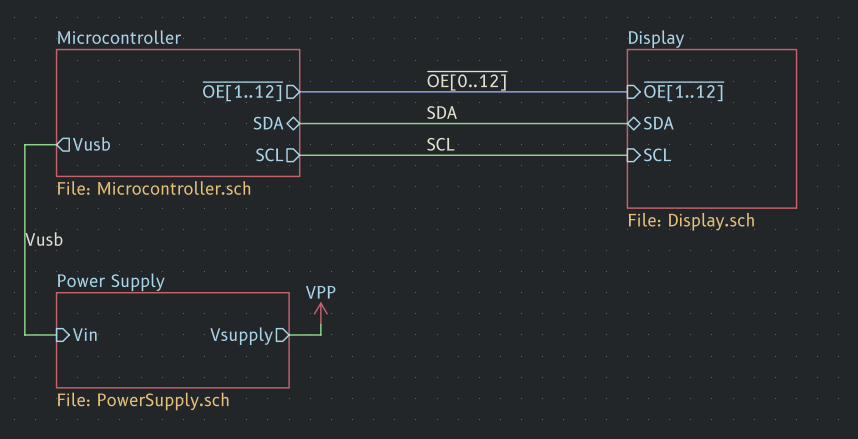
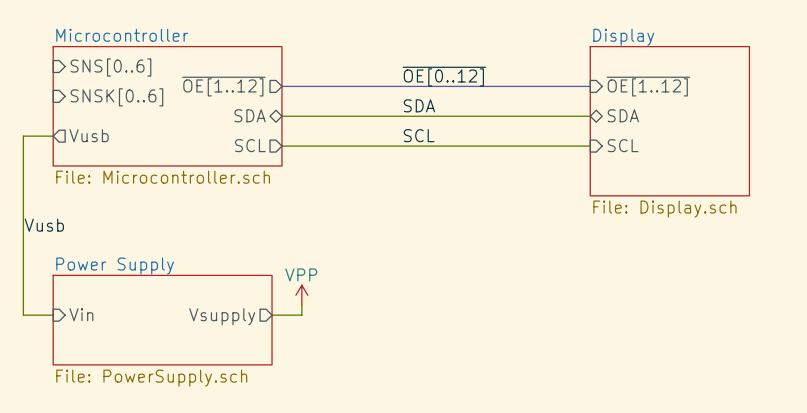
sheet pin: none -> SNS[0..6] (110, 67)
sheet pin: none -> SNSK[0..6] (116, 97)

